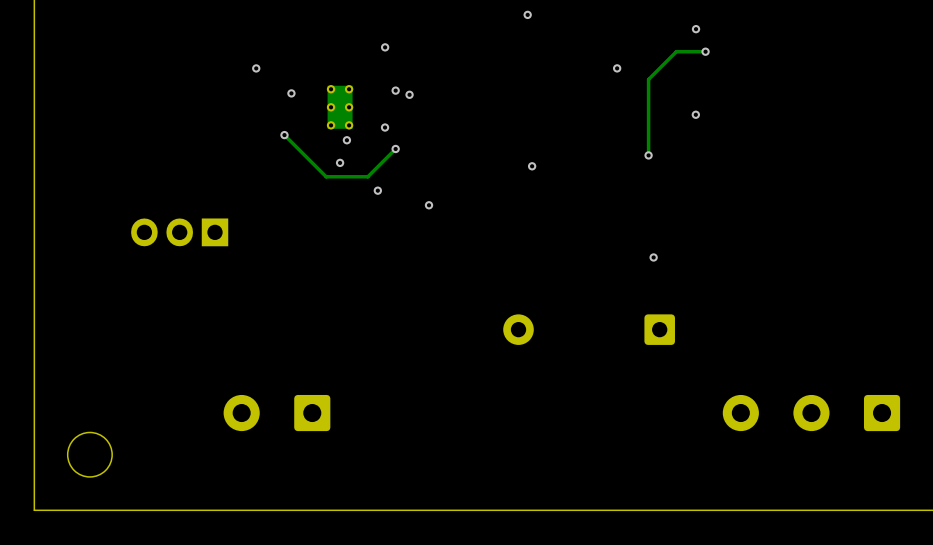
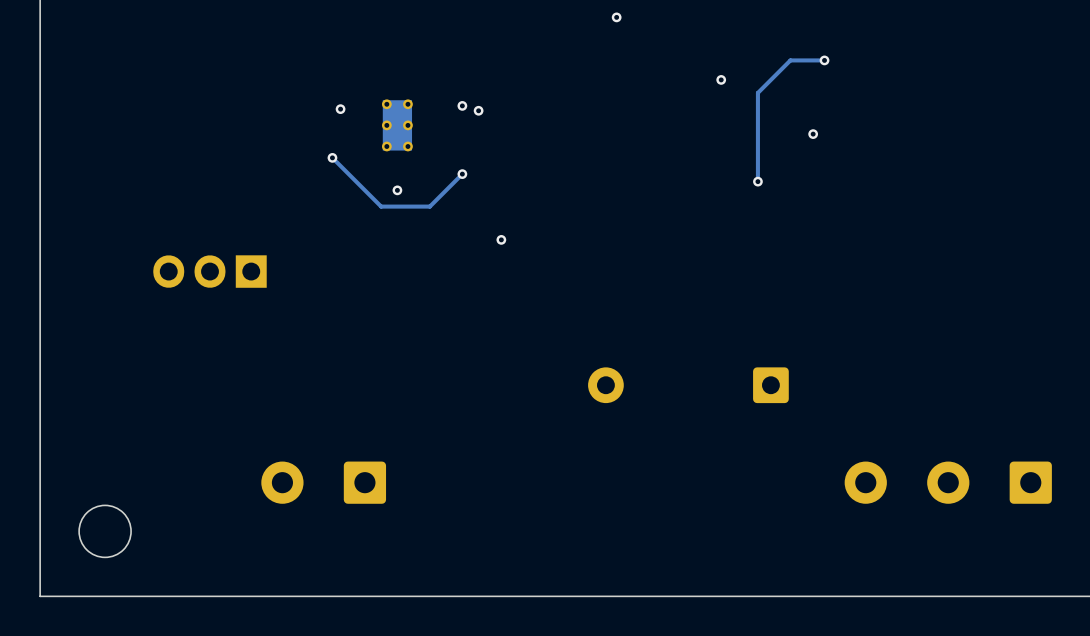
via: (696, 29) -> none
via: (385, 47) -> none
via: (256, 68) -> none
via: (385, 127) -> none
via: (346, 140) -> none
via: (532, 166) -> none
via: (377, 190) -> none
via: (653, 257) -> none

